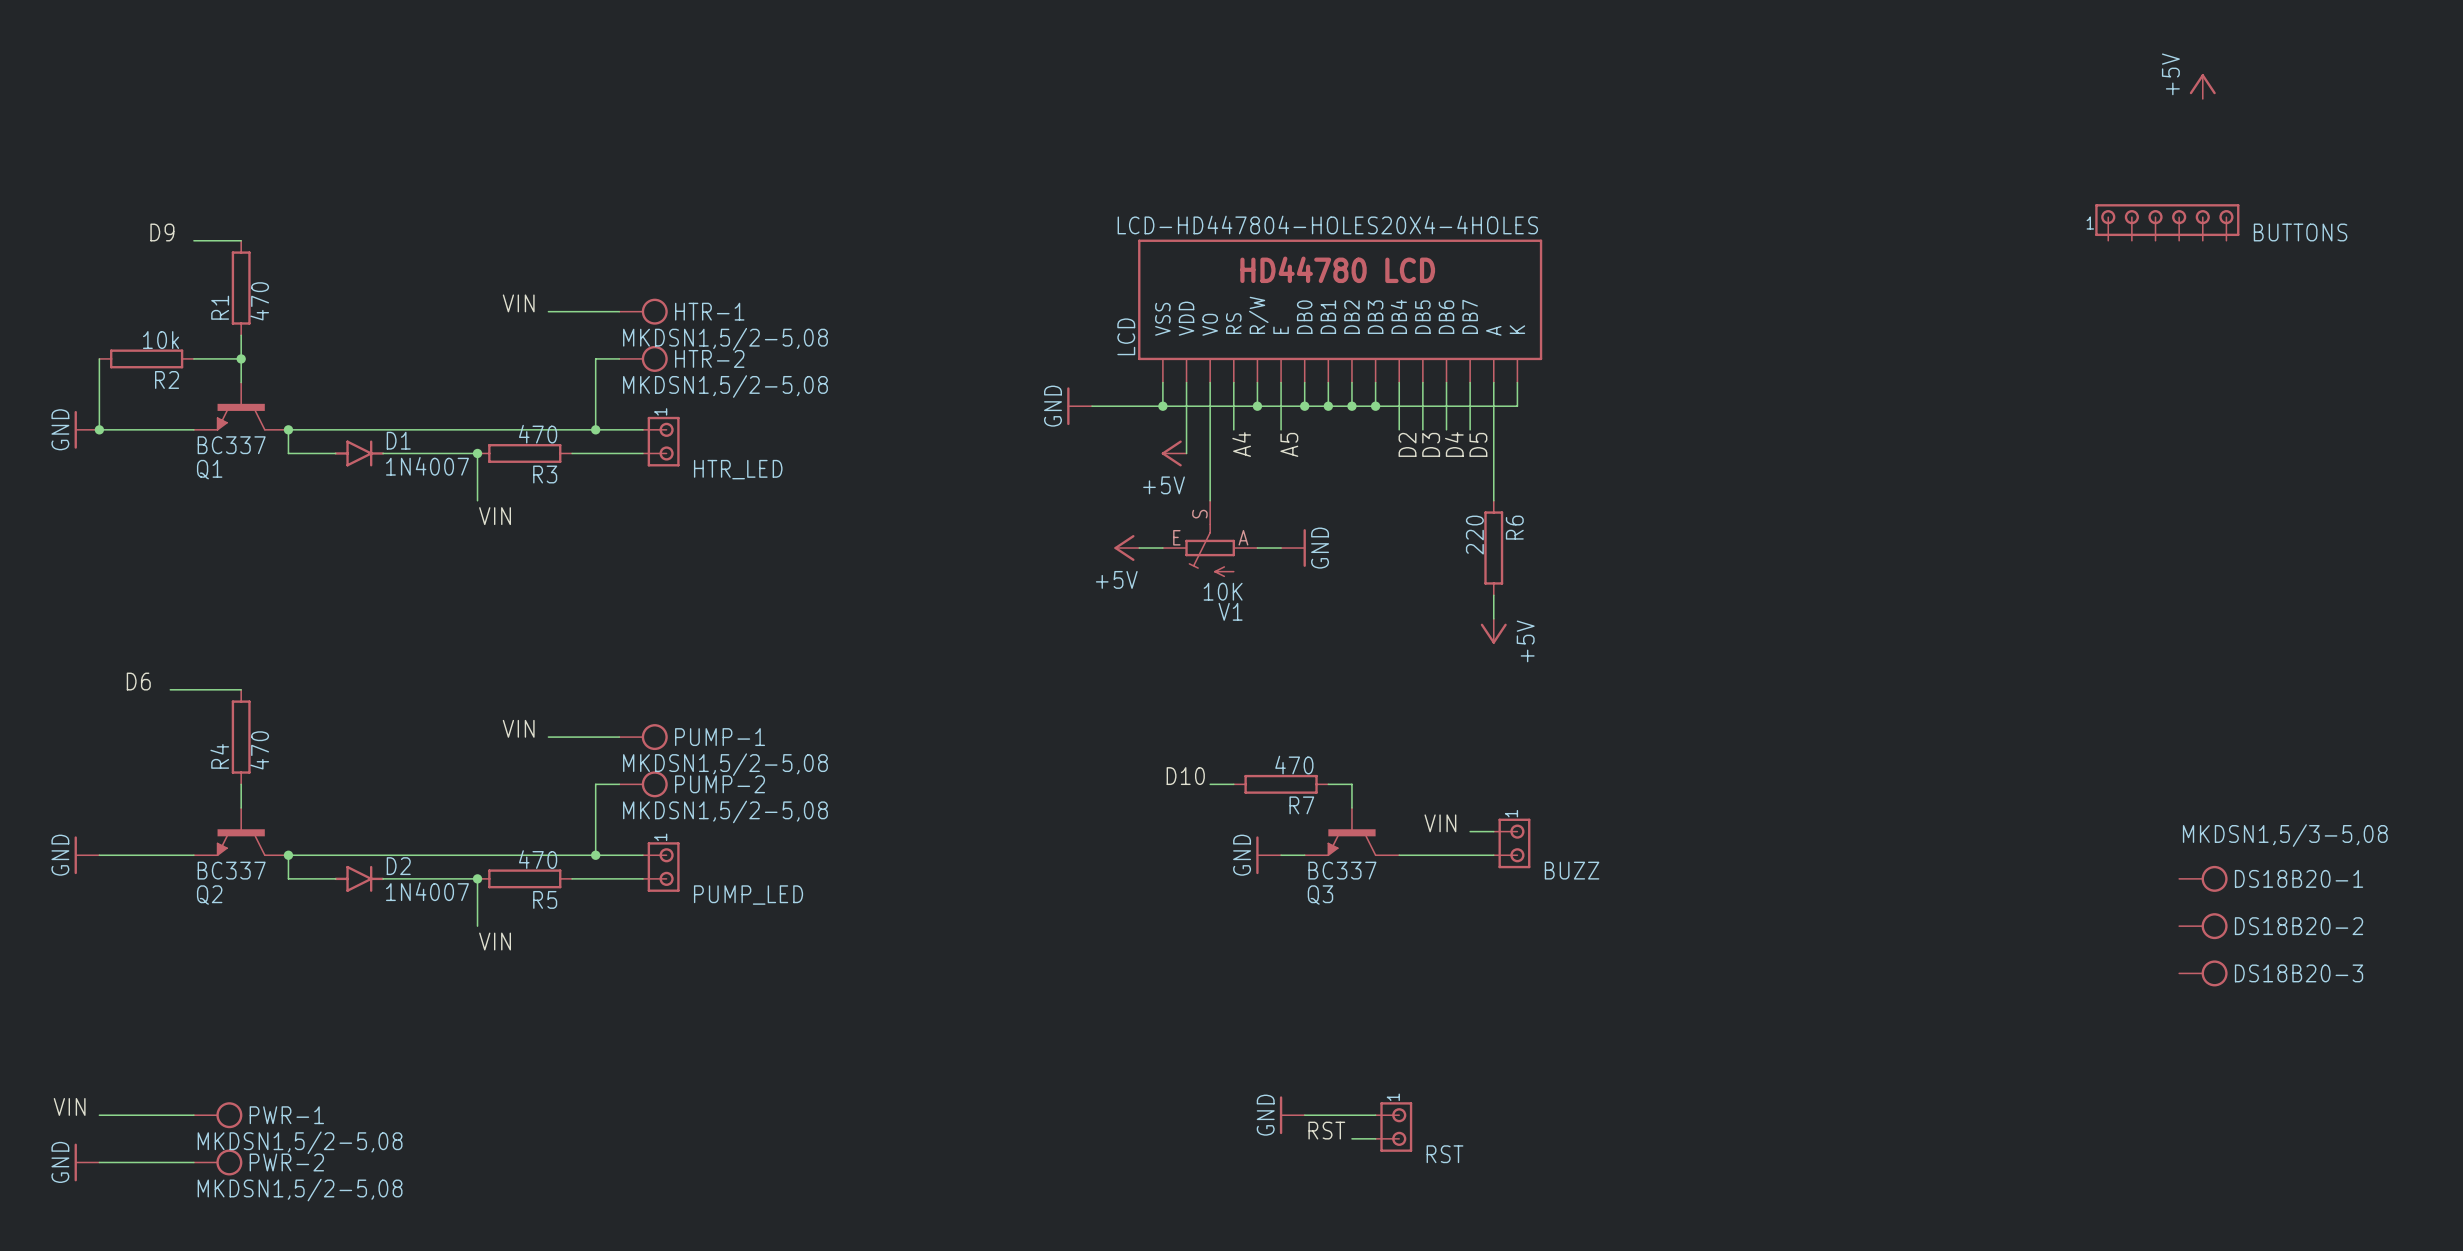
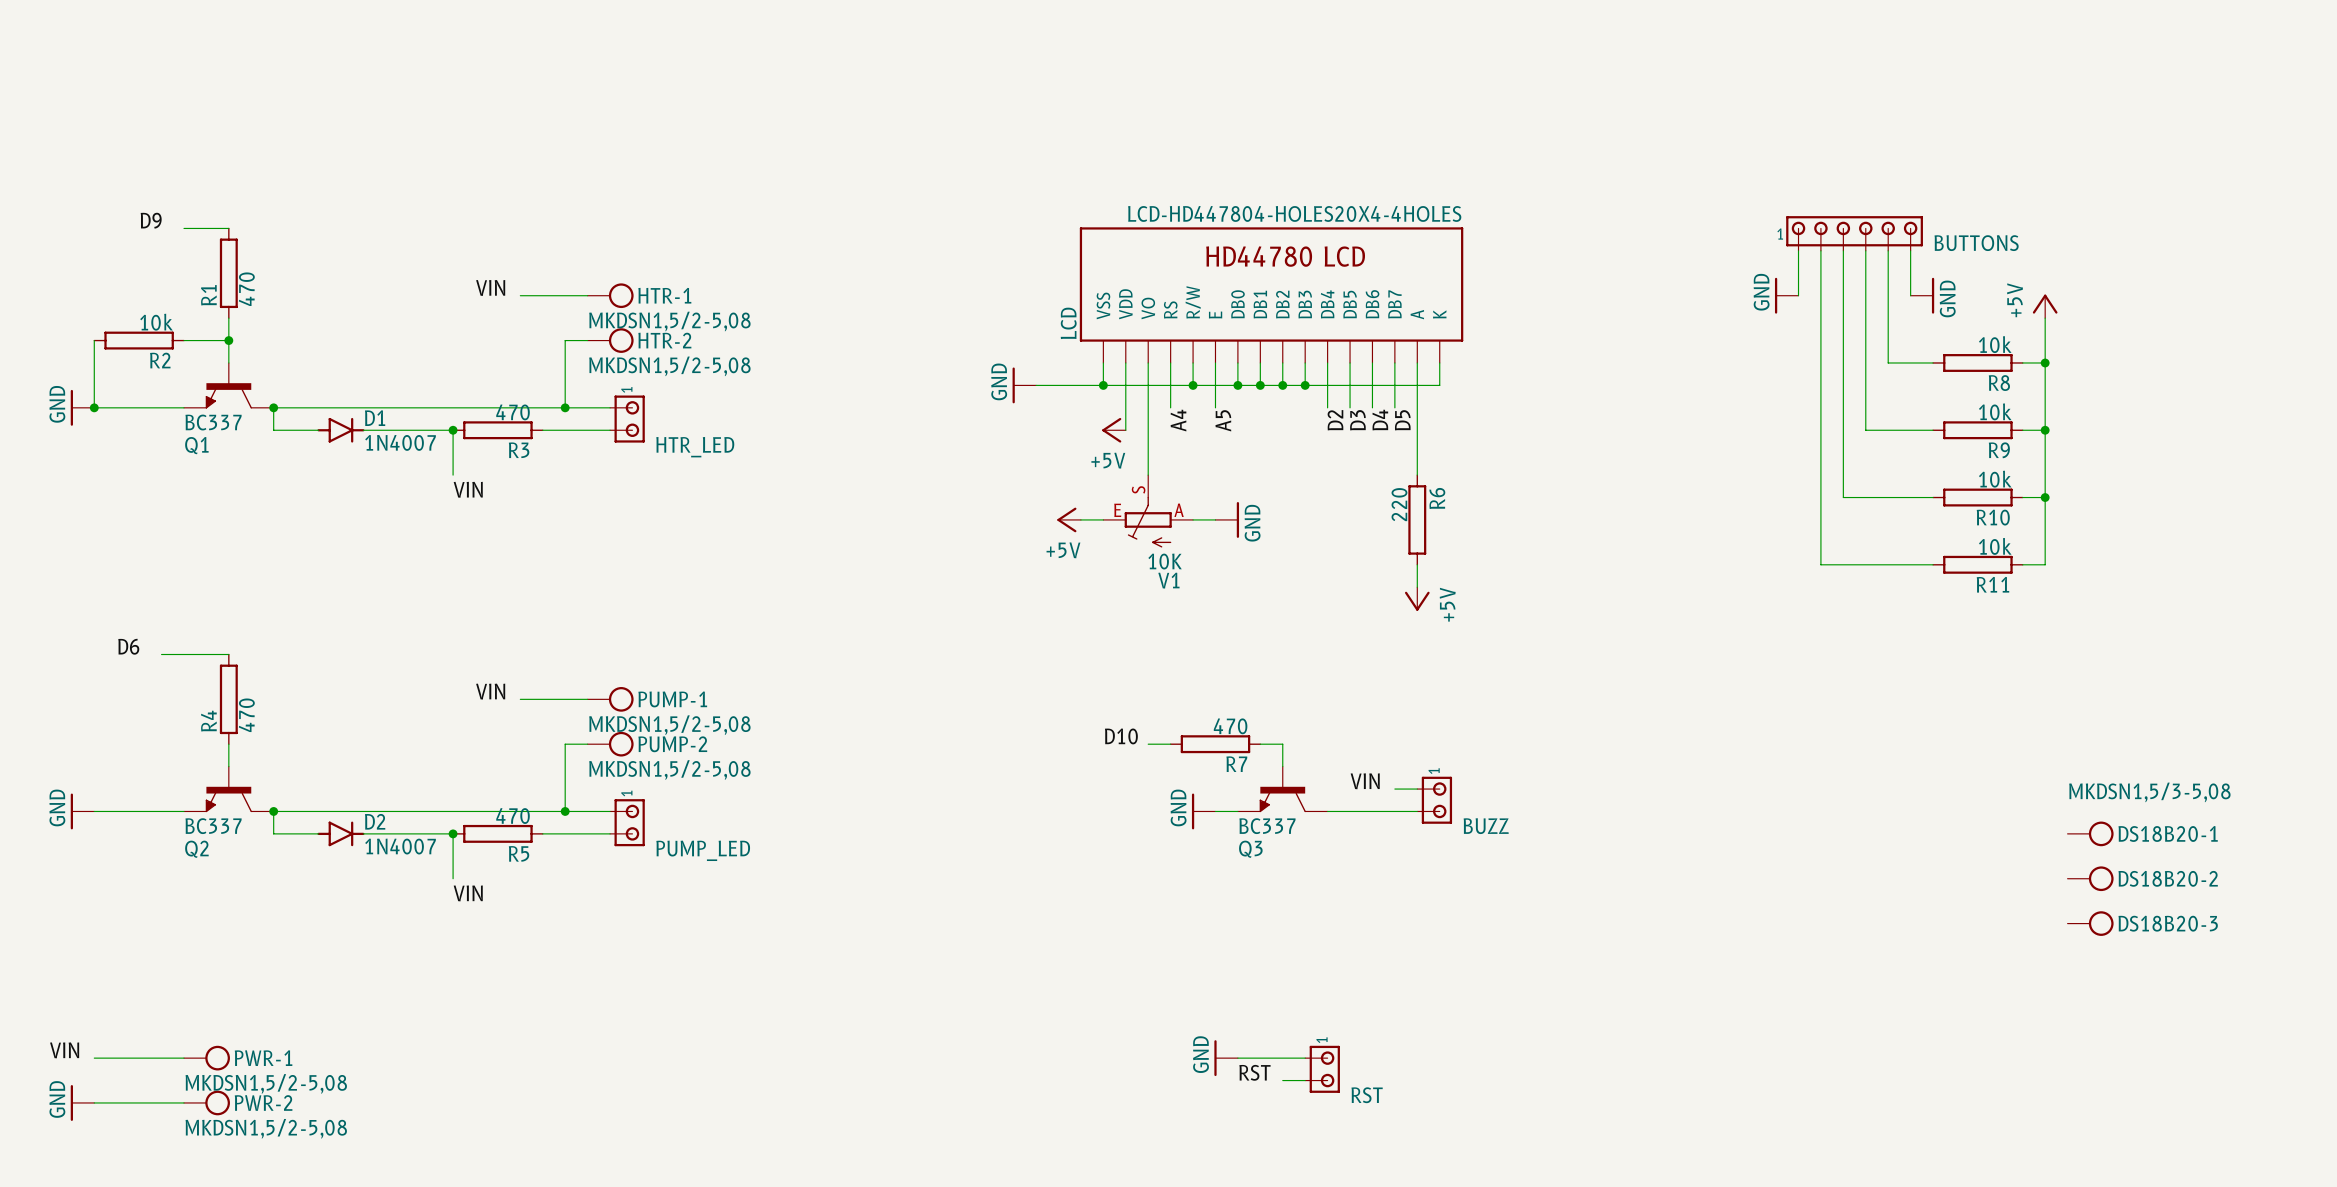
power symbol: +5V (2202, 86) -> none
BUTTONS position: (2167, 222) -> (1854, 233)
wire: none -> (1798, 250) (1798, 295)
wire: none -> (1820, 250) (1820, 564) (1933, 564)
wire: none -> (1843, 250) (1843, 497) (1933, 497)
wire: none -> (1865, 250) (1865, 430) (1933, 430)
wire: none -> (1888, 250) (1888, 362) (1933, 362)
wire: none -> (1910, 250) (1910, 295)
power symbol: none -> GND (1786, 295)
power symbol: none -> GND (1922, 295)
power symbol: none -> +5V (2045, 306)
wire: none -> (2045, 318) (2045, 564) (2022, 564)
R8: none -> 10k (1977, 362)
wire: none -> (2022, 362) (2045, 362)
junction: none -> (2045, 362)
R9: none -> 10k (1977, 430)
wire: none -> (2022, 430) (2045, 430)
junction: none -> (2045, 430)
R10: none -> 10k (1977, 497)
wire: none -> (2022, 497) (2045, 497)
junction: none -> (2045, 497)
R11: none -> 10k (1977, 564)

